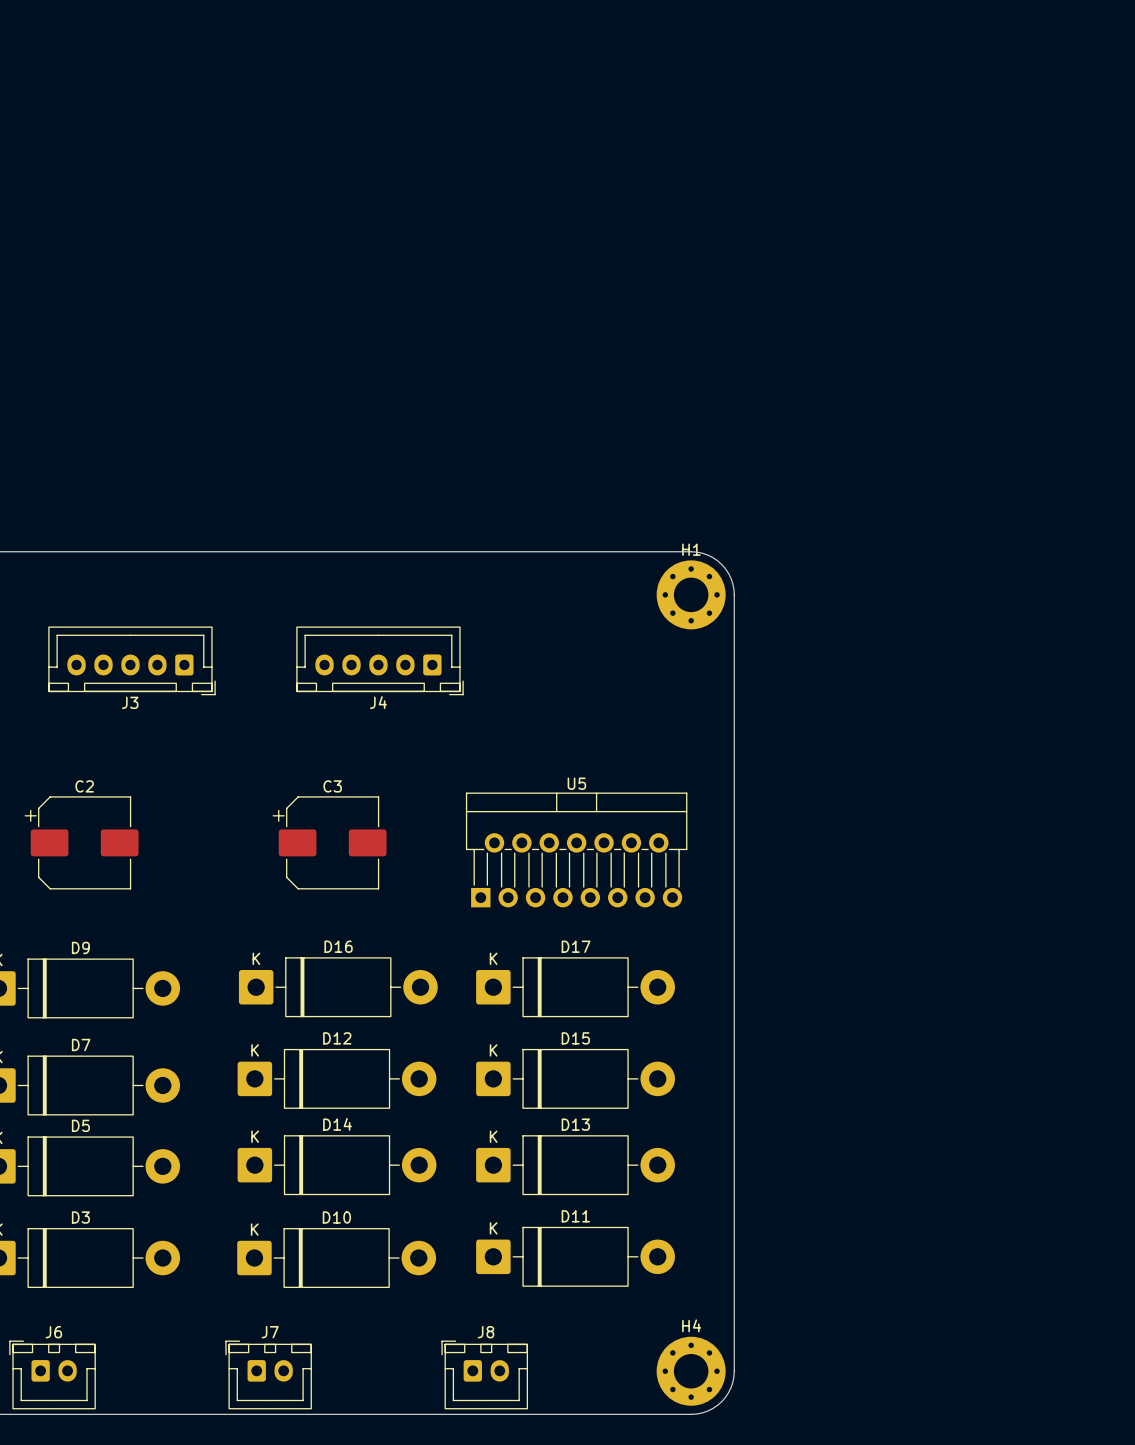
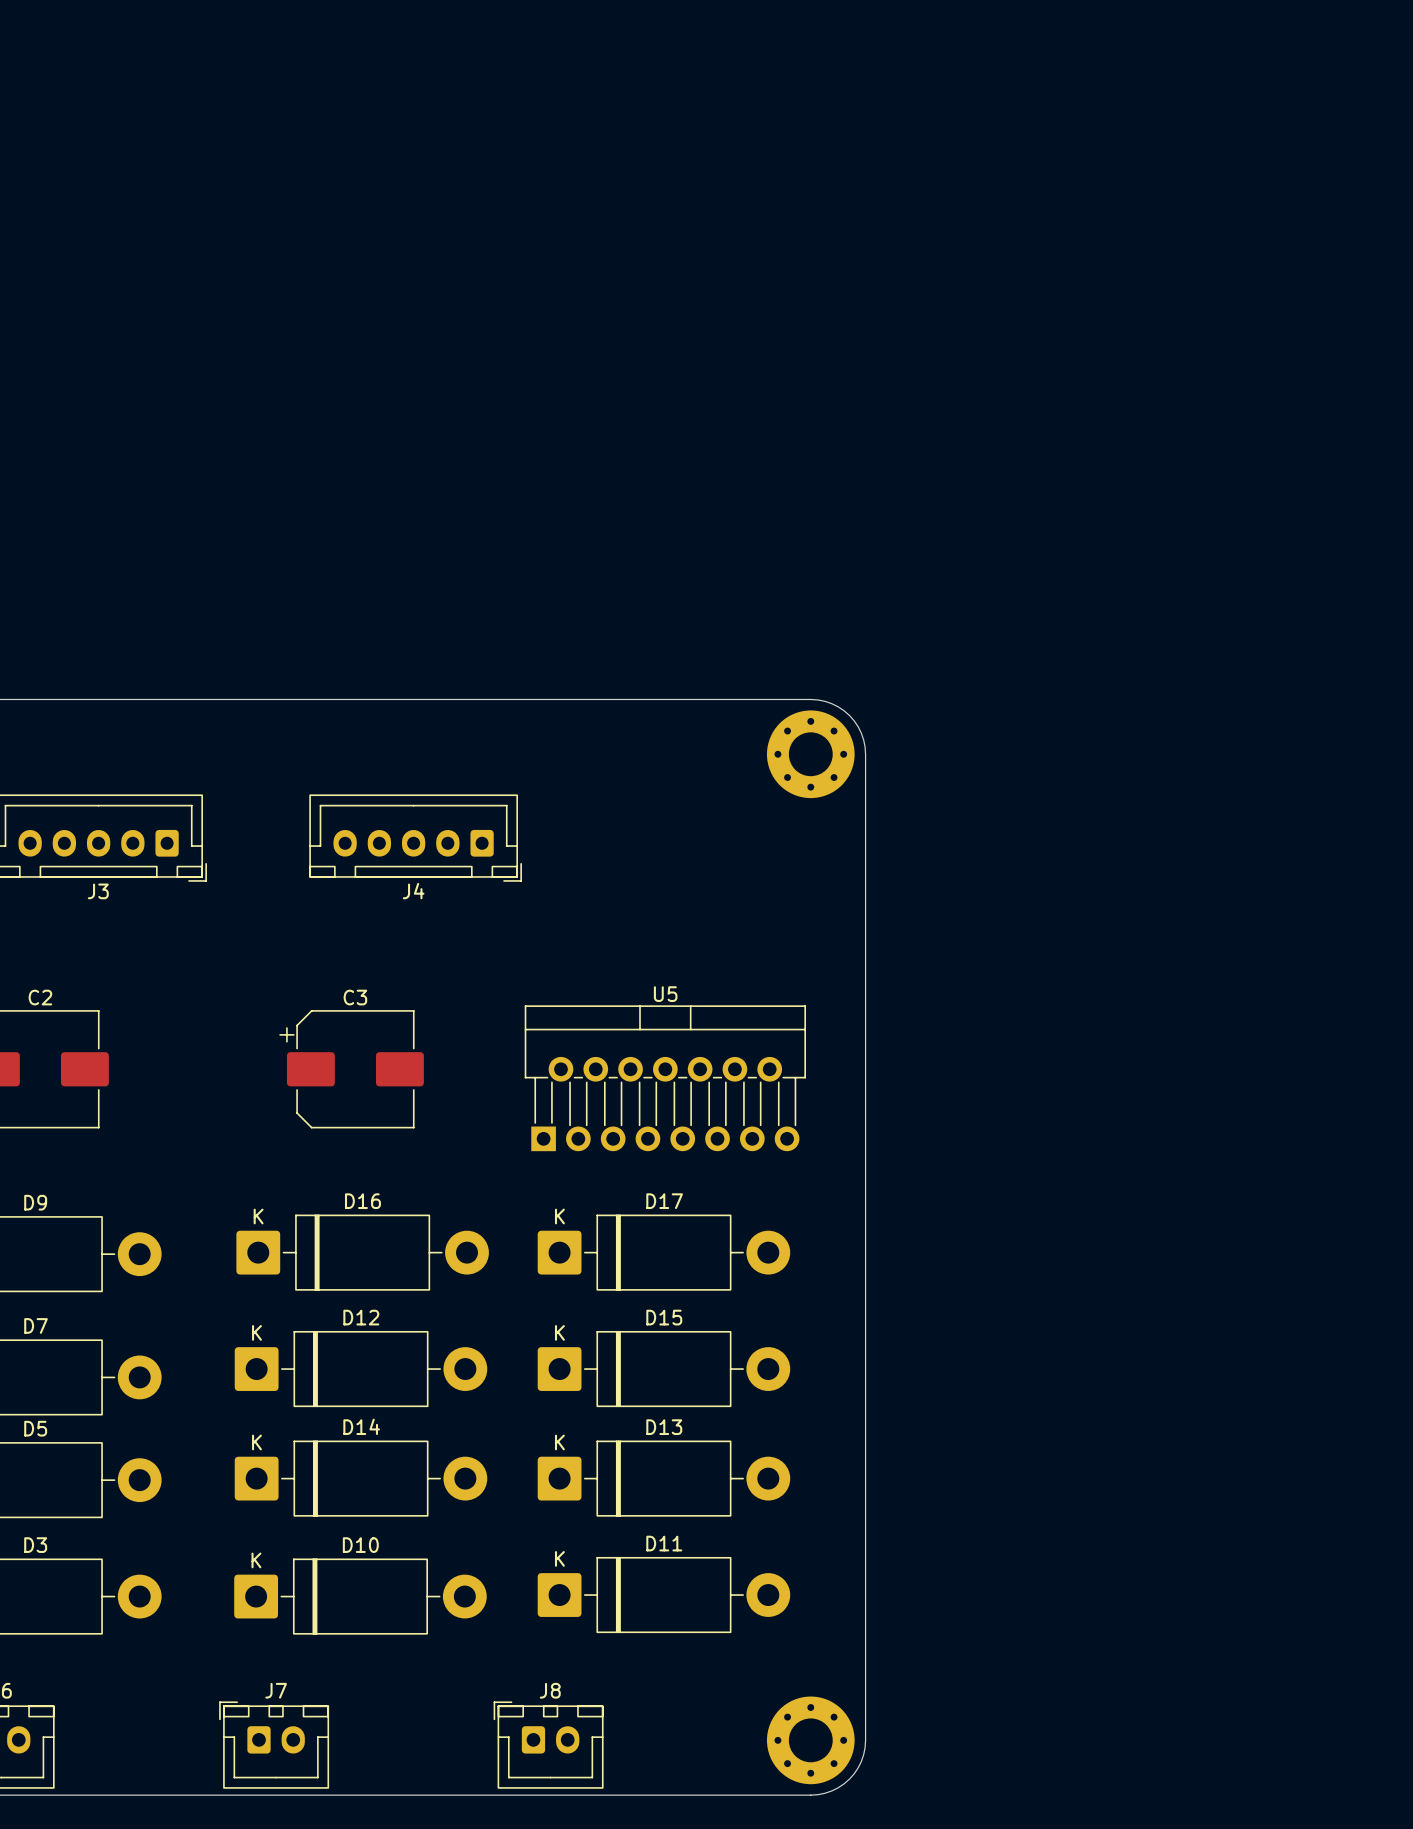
H1 name: H1 (691, 549) -> none
H4 name: H4 (691, 1325) -> none

